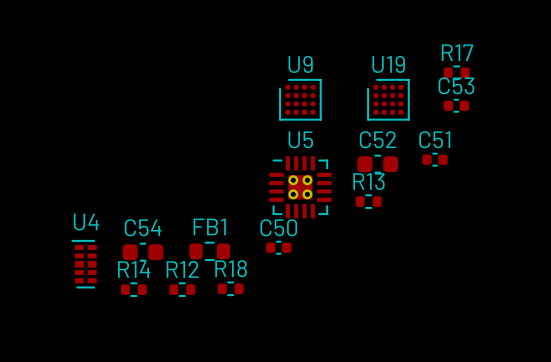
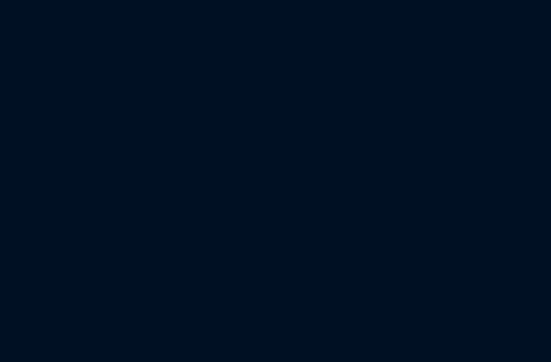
R17: (456, 72) -> none
U9: (300, 99) -> none
U19: (388, 99) -> none
C53: (456, 105) -> none
C51: (435, 159) -> none
C52: (377, 164) -> none
U5: (300, 187) -> none
R13: (368, 201) -> none
C50: (278, 247) -> none
FB1: (209, 251) -> none
C54: (142, 252) -> none
U4: (84, 264) -> none
R18: (230, 288) -> none
R14: (133, 289) -> none
R12: (182, 289) -> none

